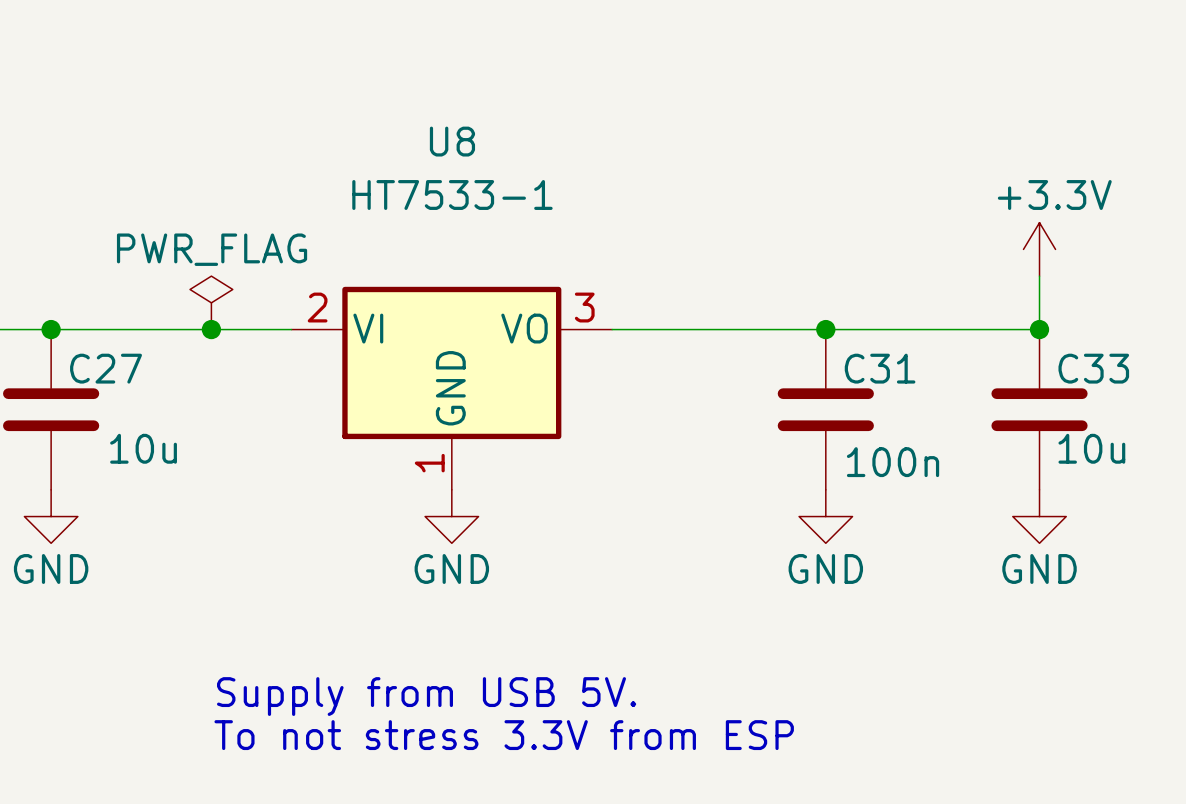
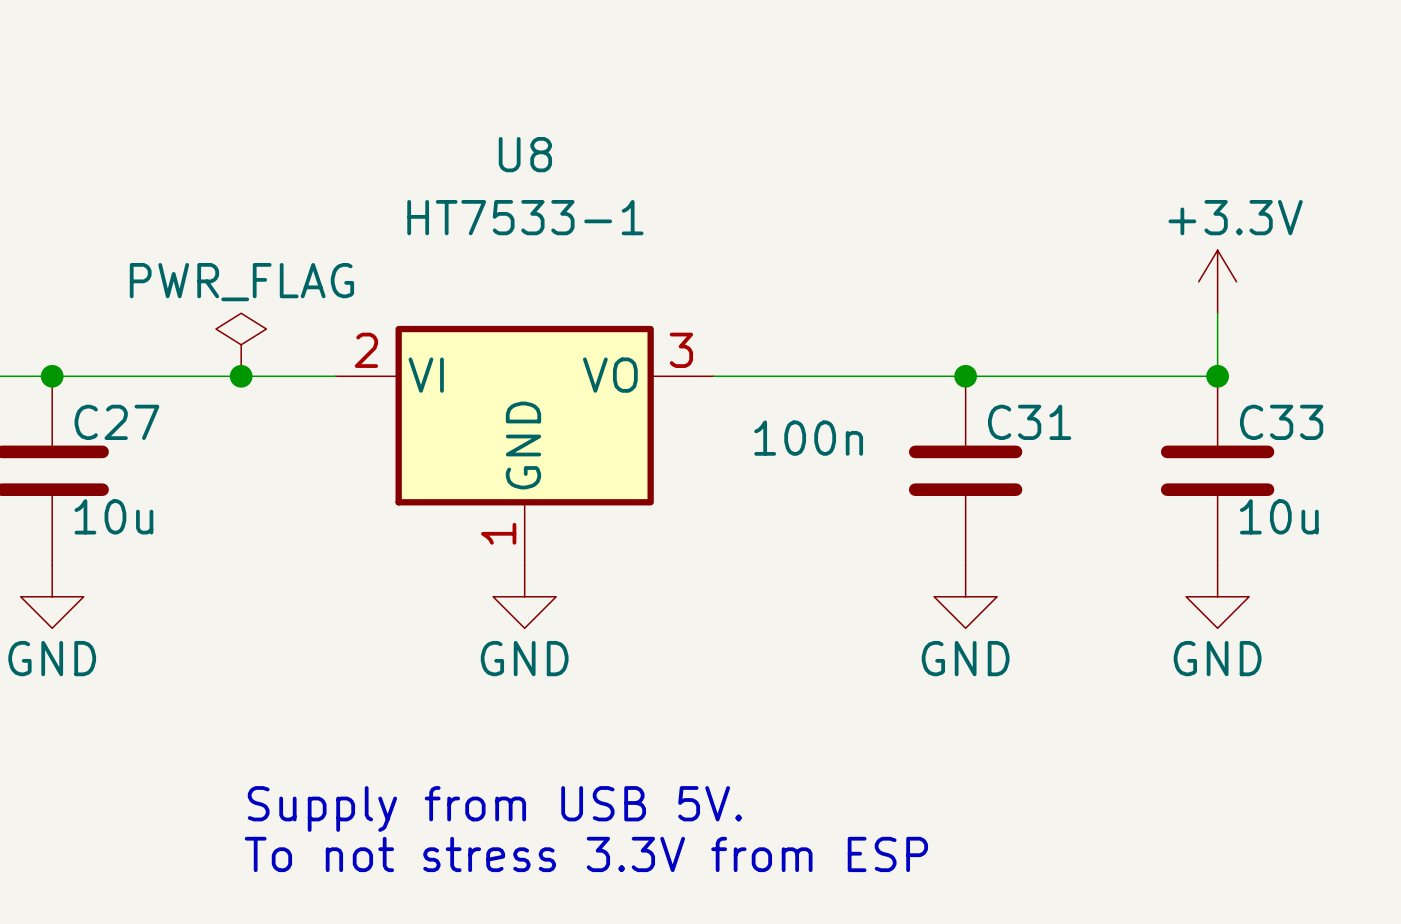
C27 value position: 10u (143, 448) -> 10u (113, 516)
C31 value position: 100n (893, 462) -> 100n (808, 438)

